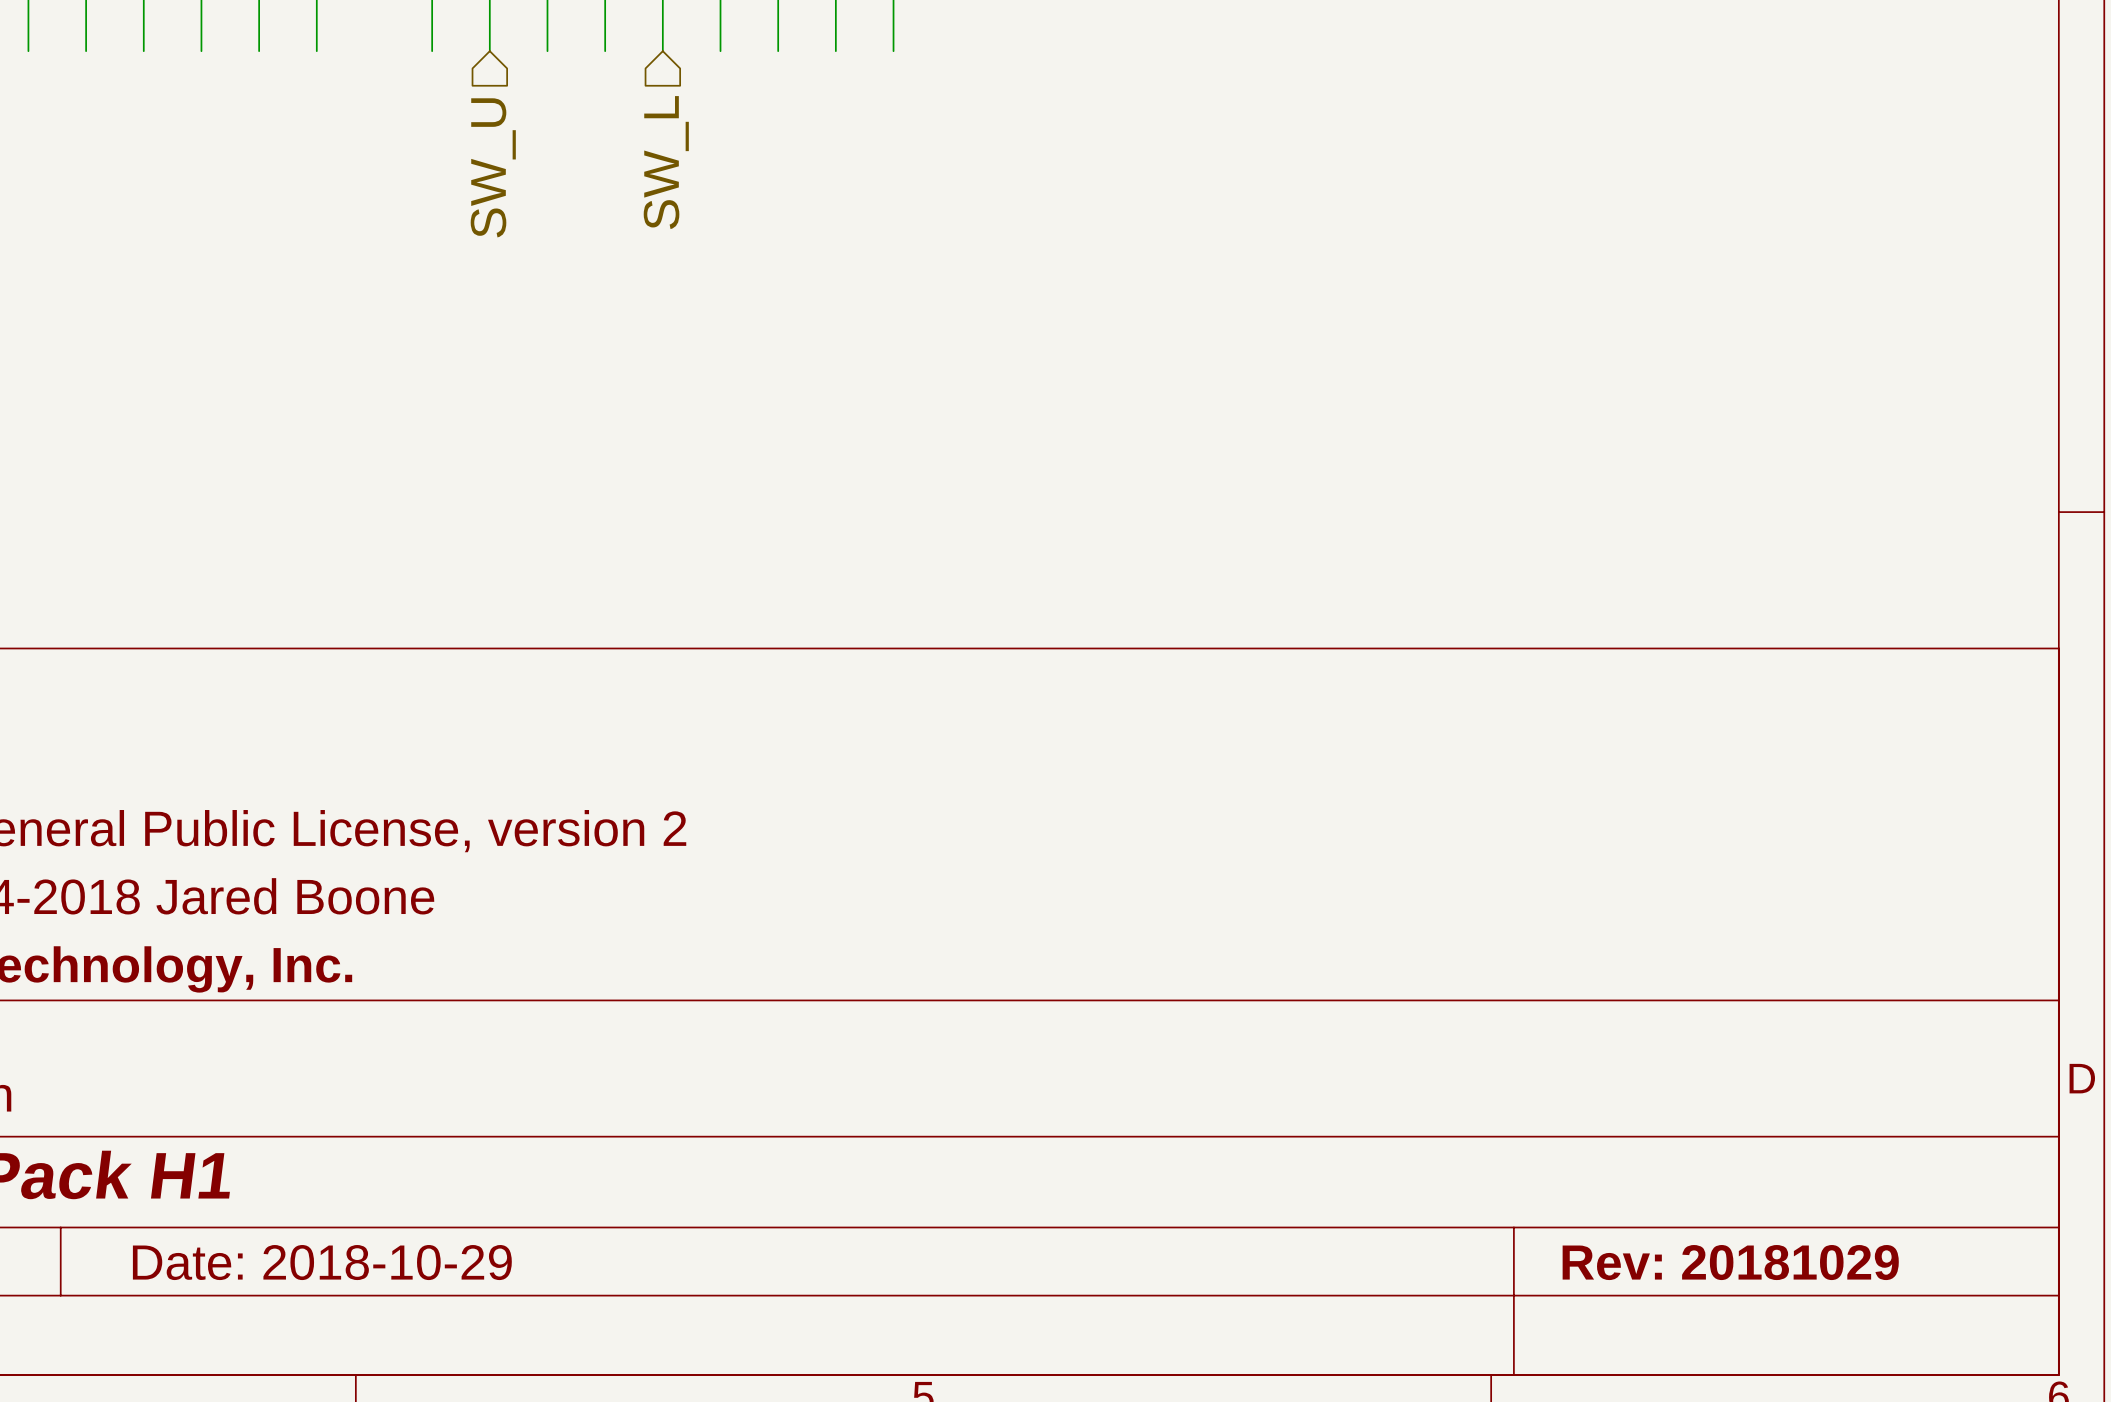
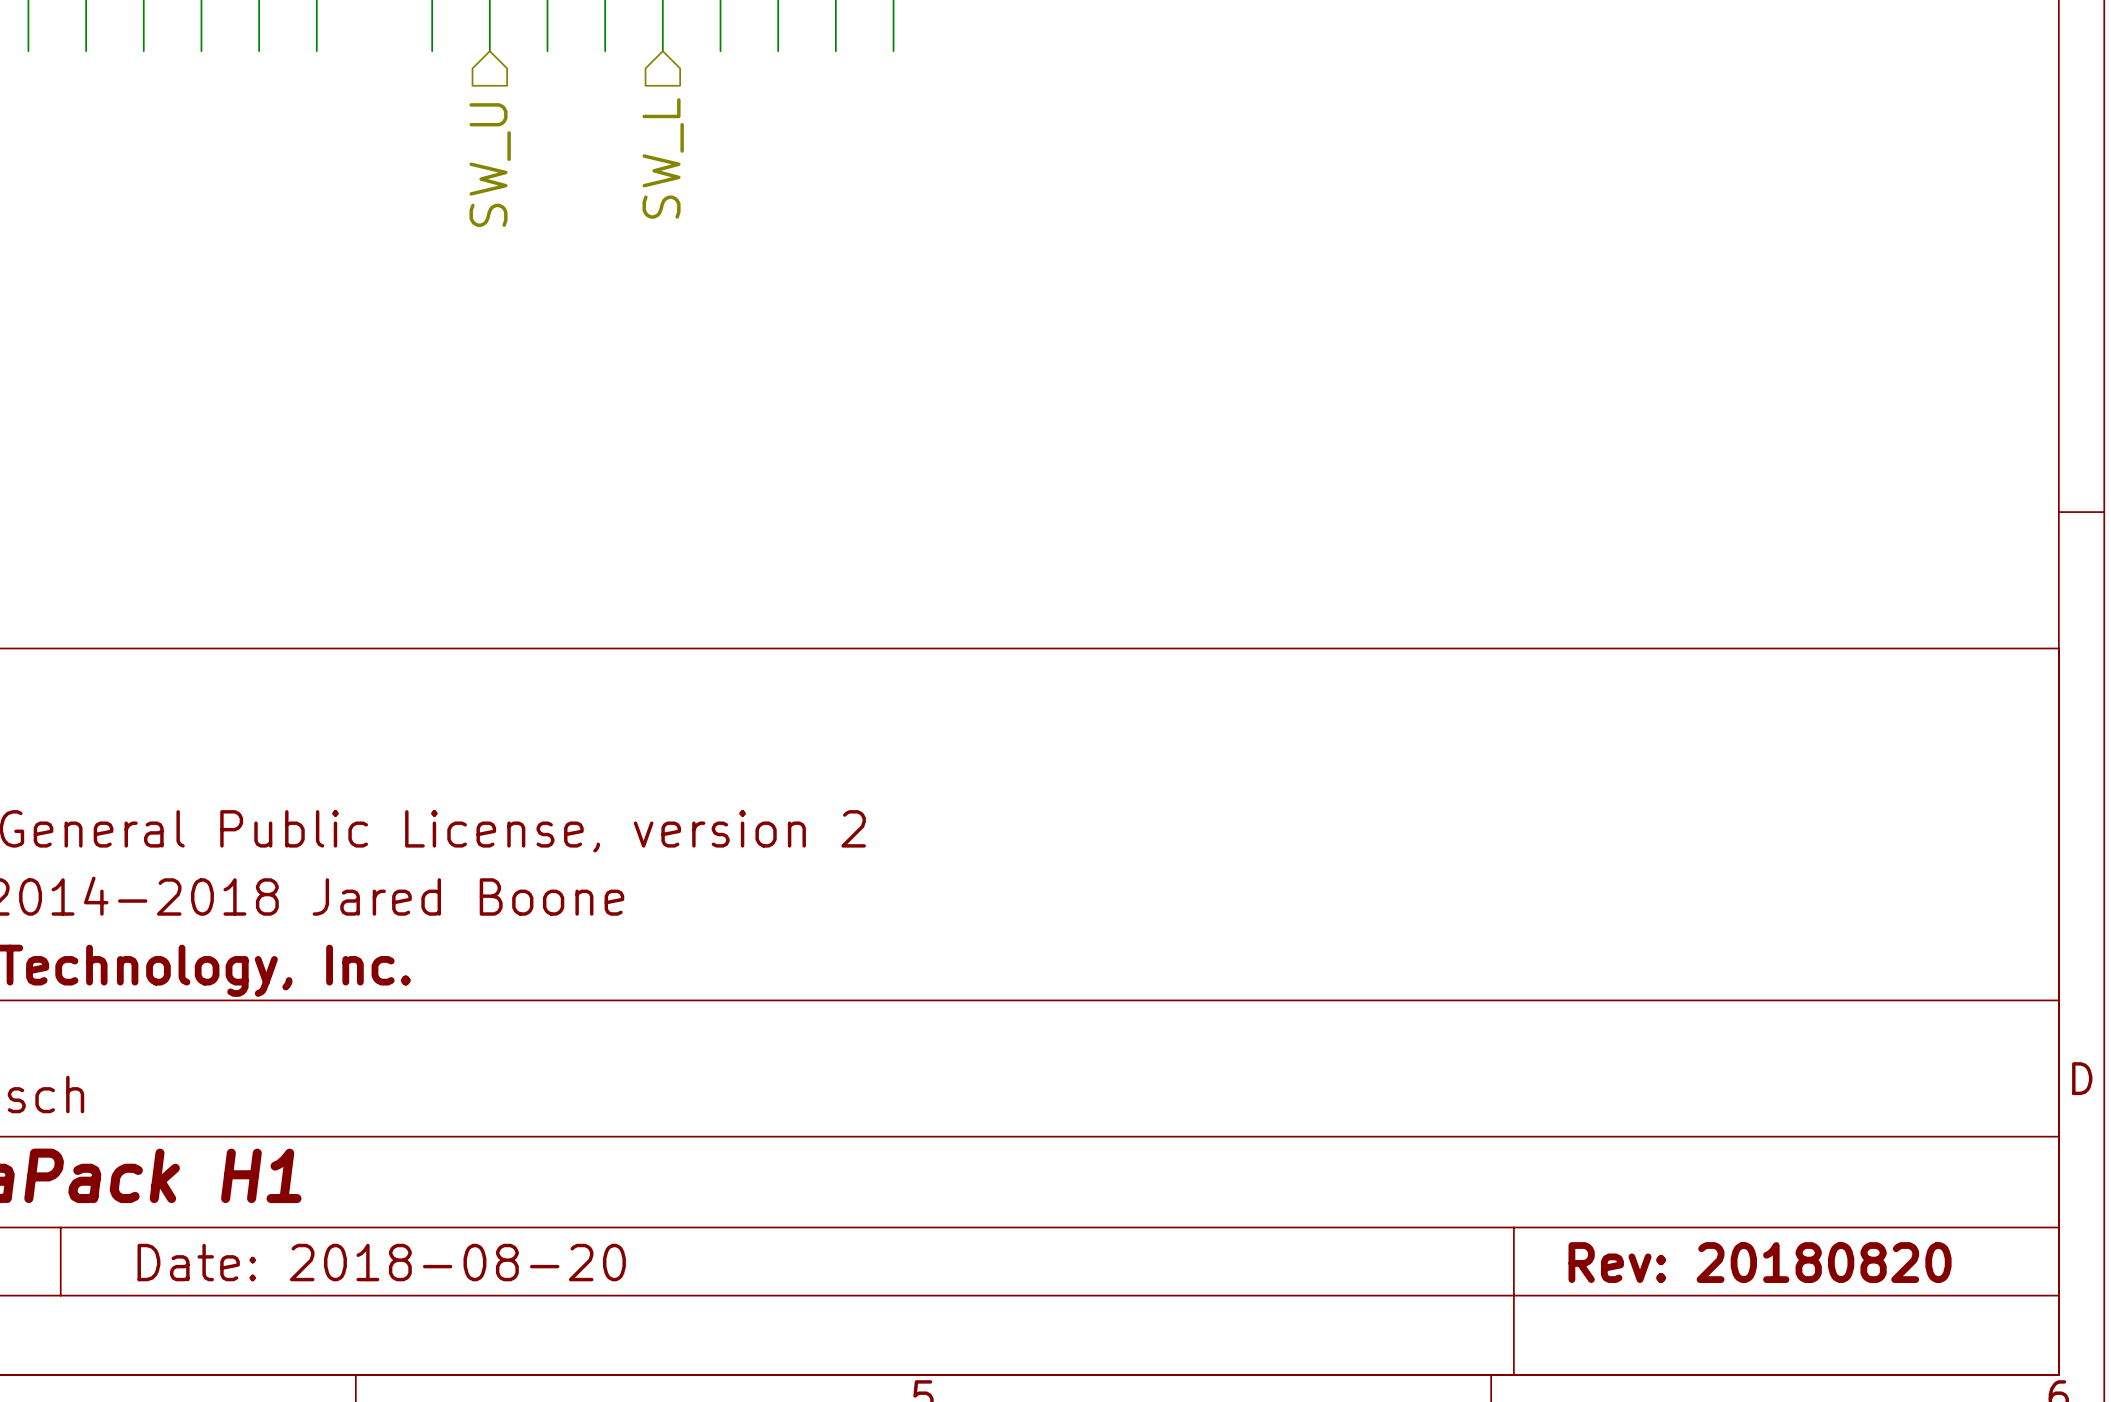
title block: Date: 2018-10-29 (322, 1262) -> Date: 2018-08-20 (381, 1262)
title block: Rev: 20181029 (1730, 1262) -> Rev: 20180820 (1760, 1262)

